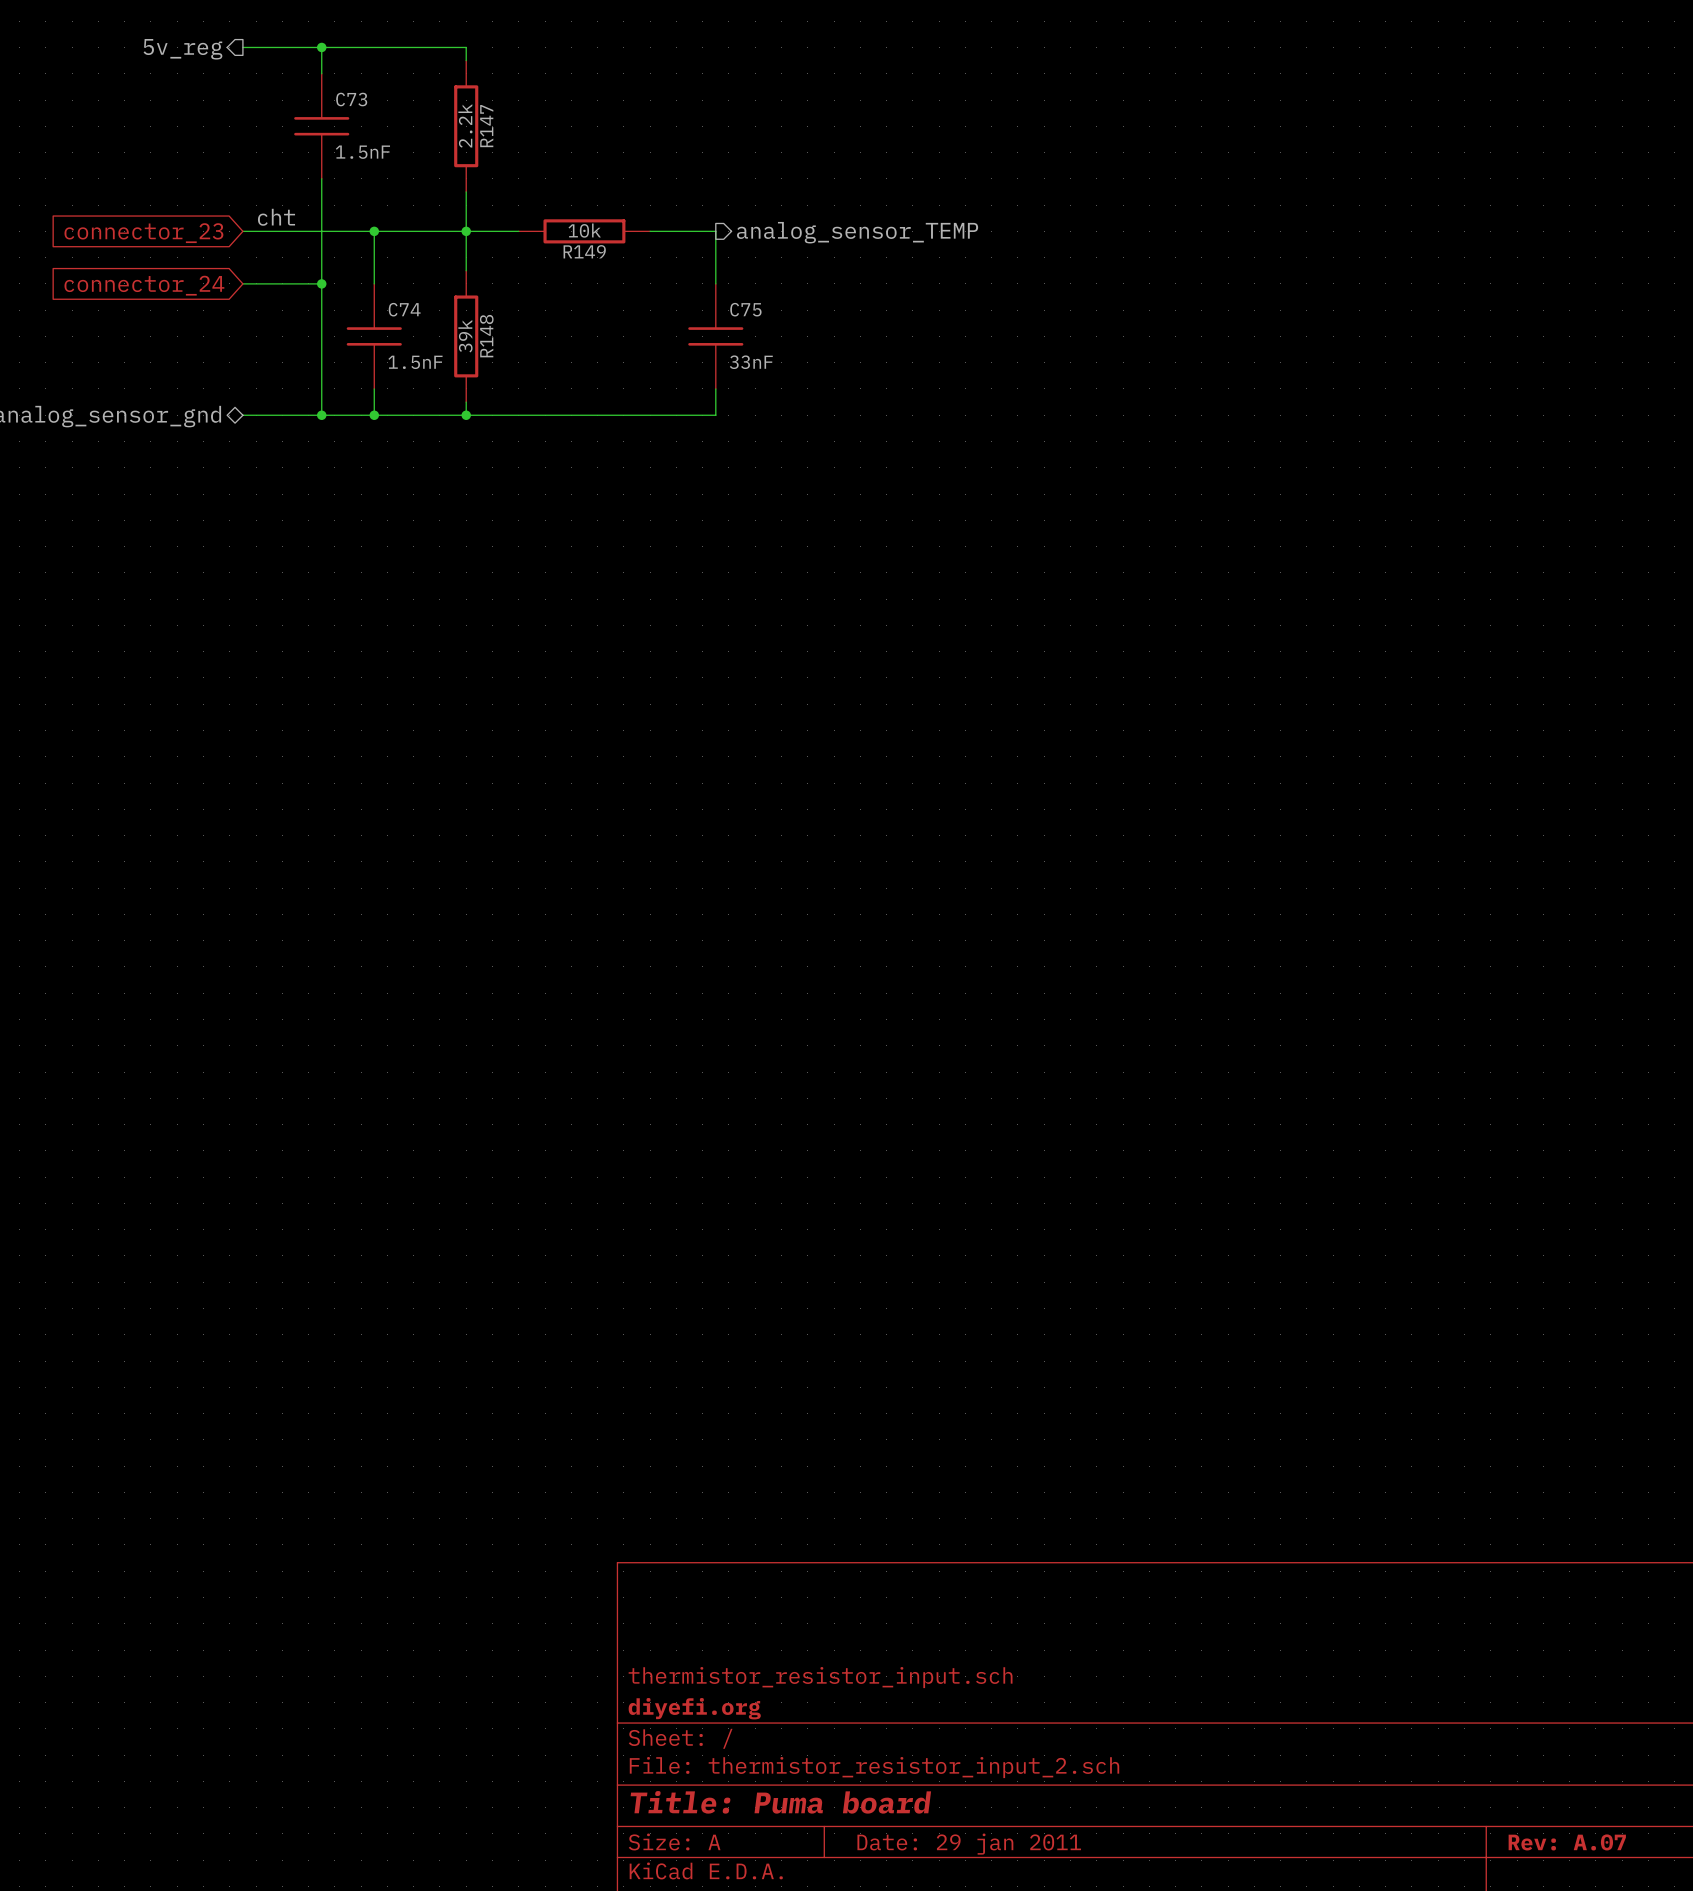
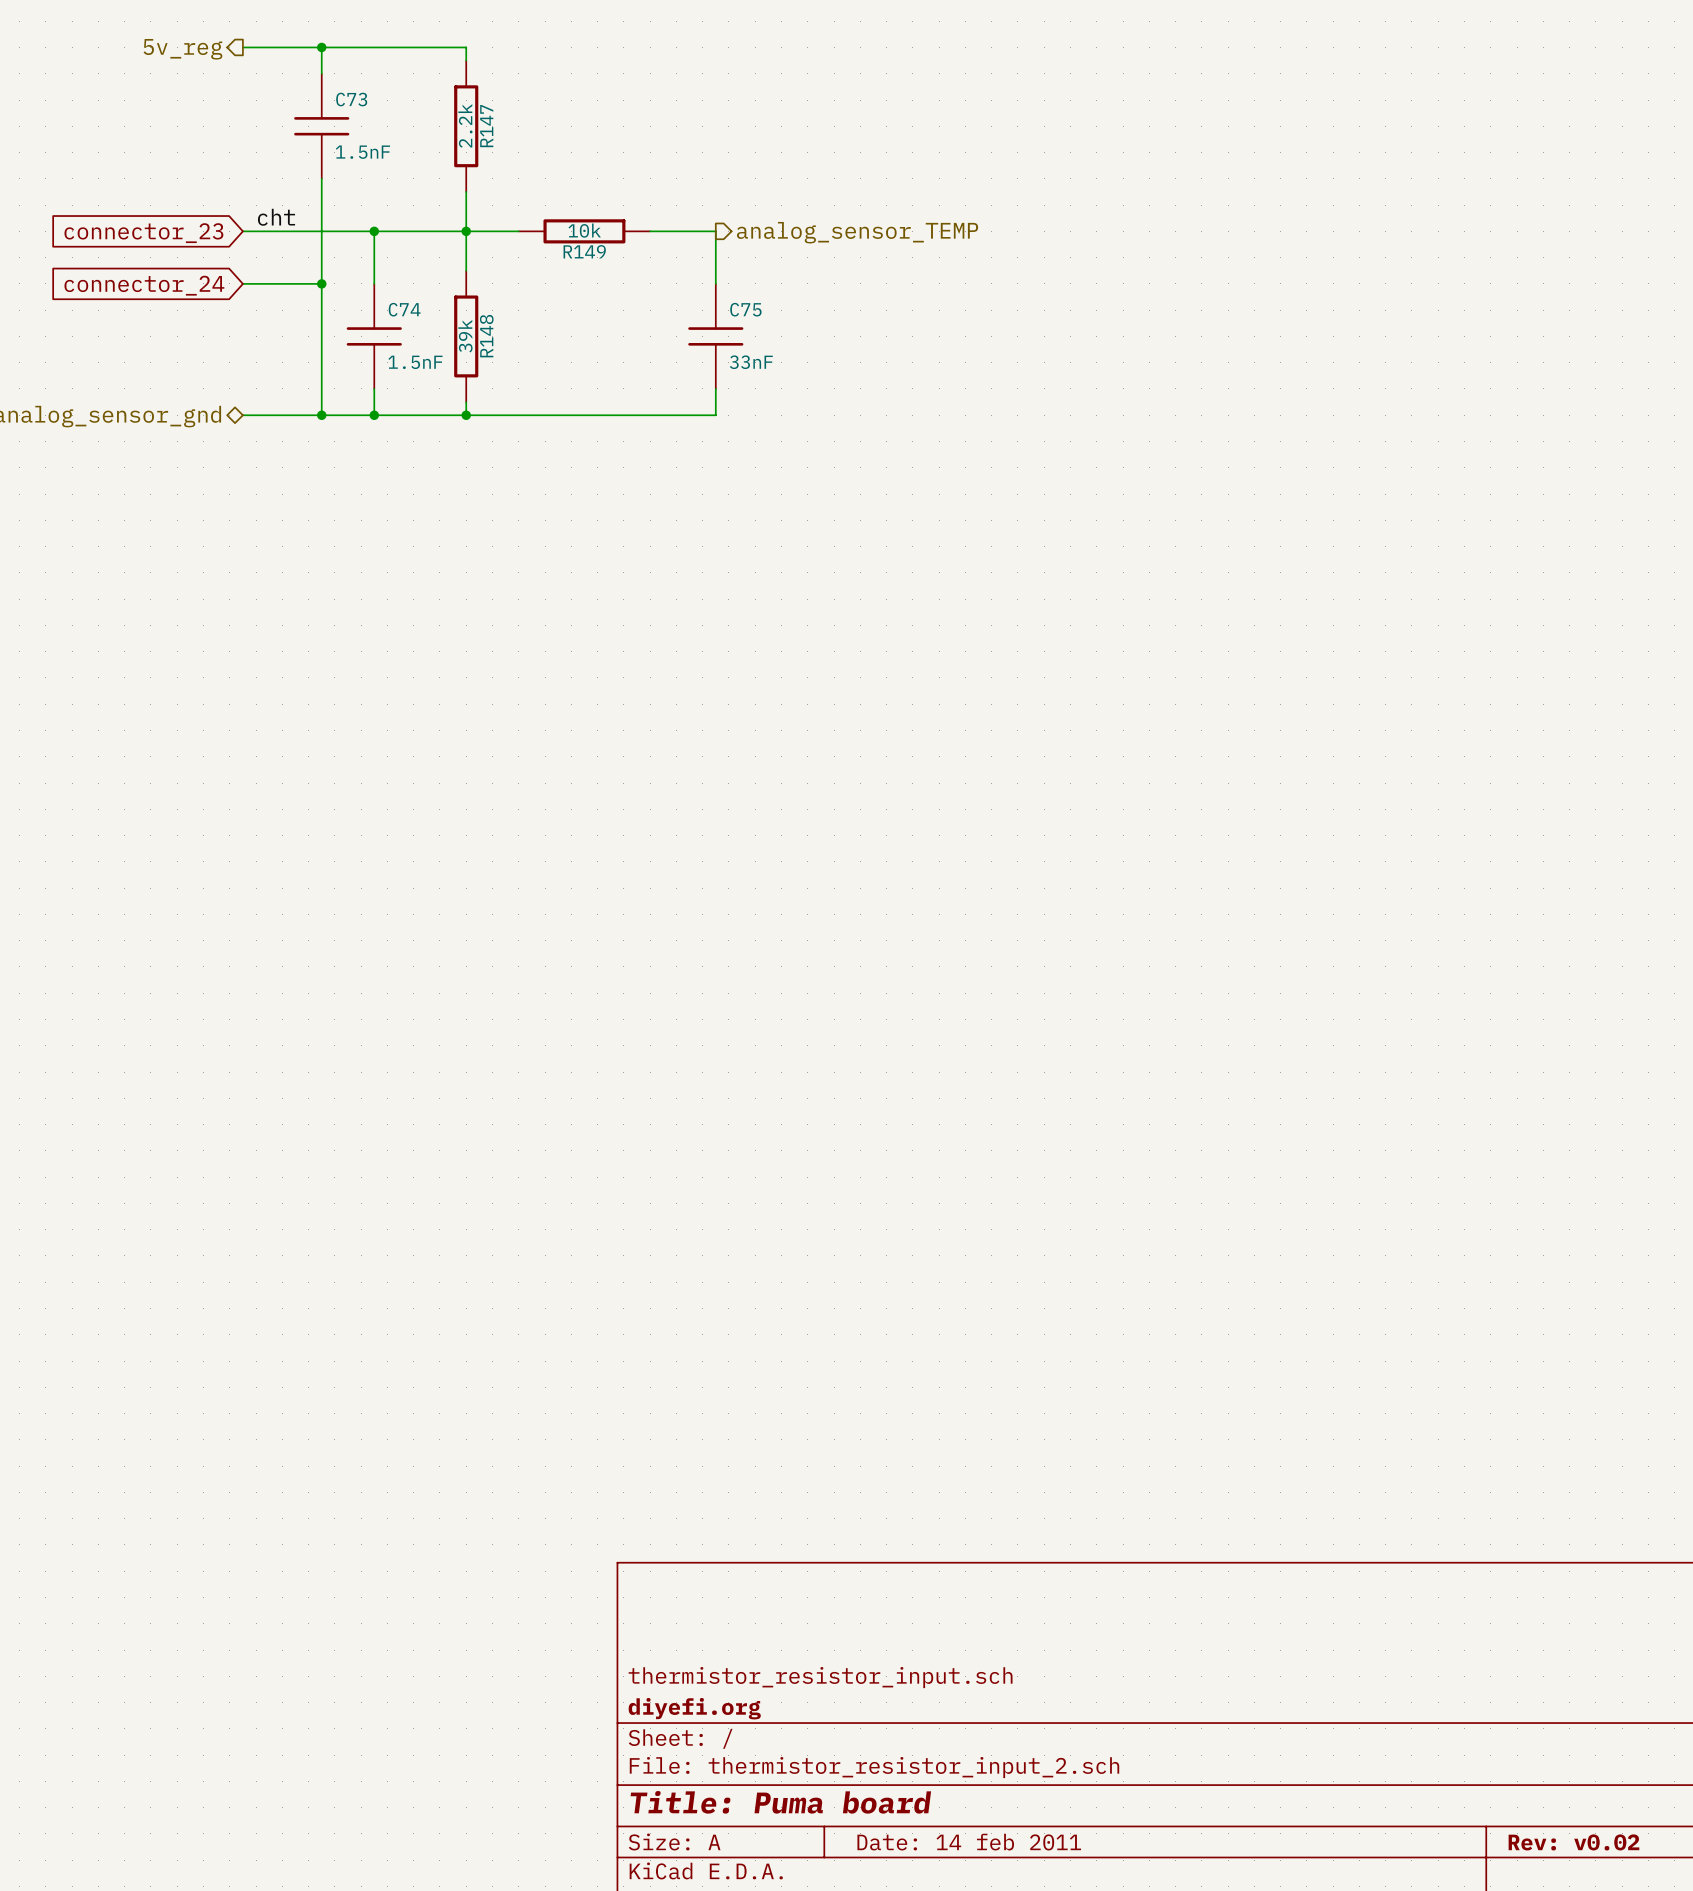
title block: Rev: A.07 (1567, 1842) -> Rev: v0.02 (1573, 1842)
title block: Date: 29 jan 2011 (969, 1844) -> Date: 14 feb 2011 (969, 1842)

